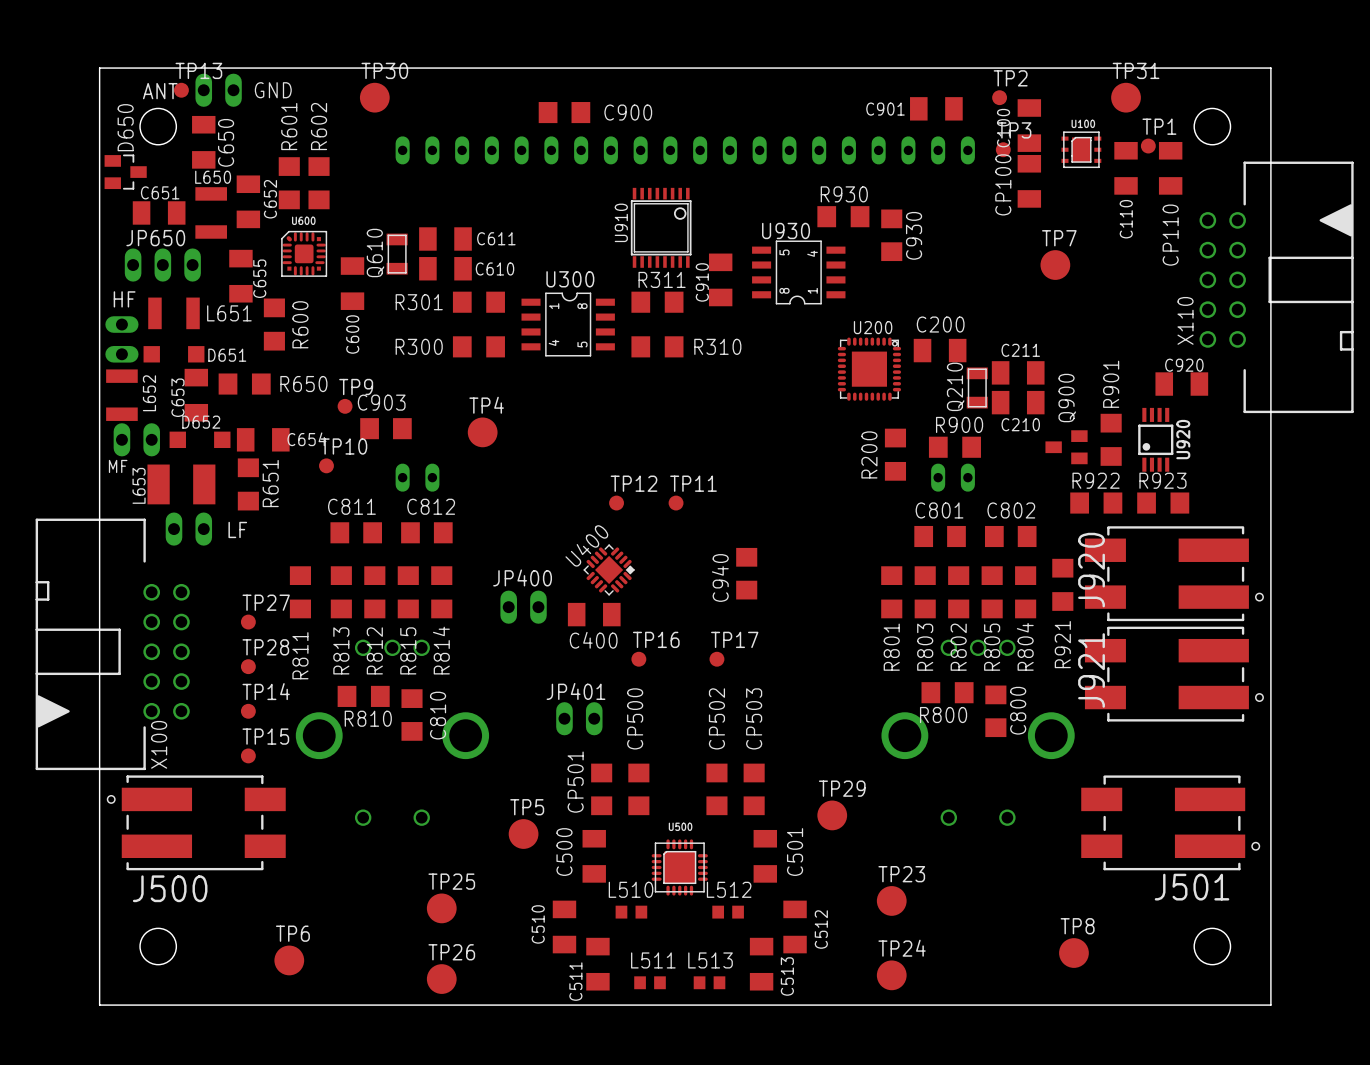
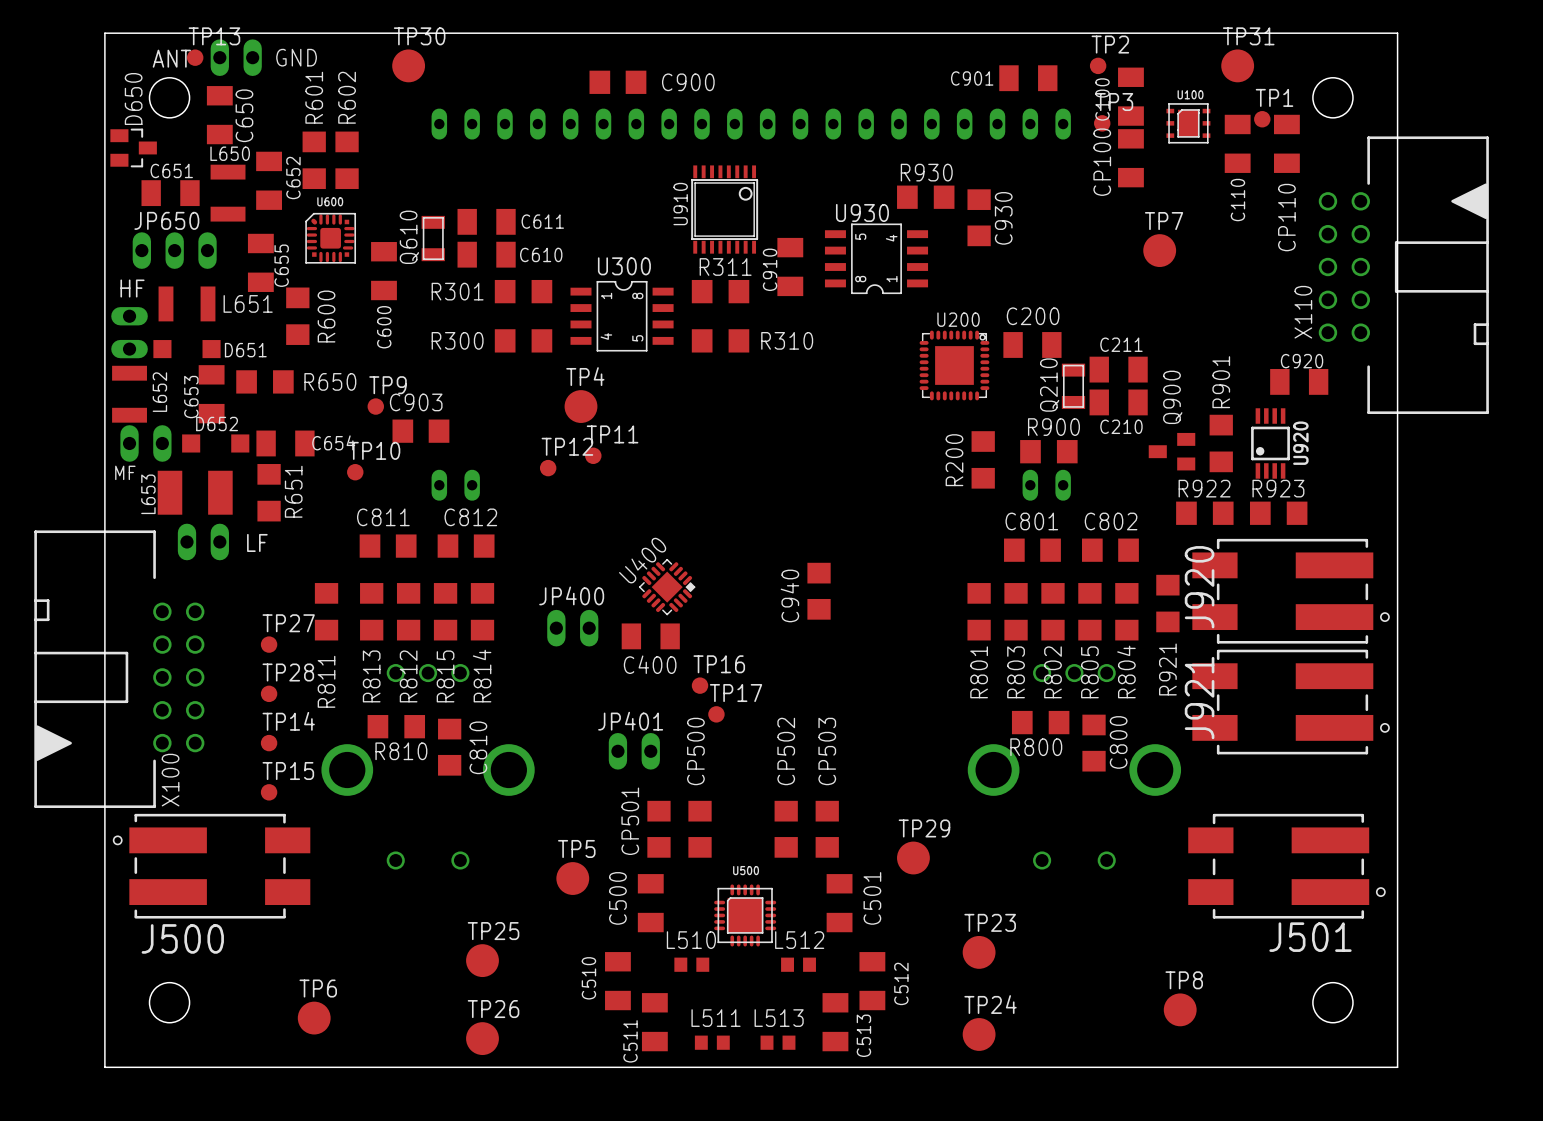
TP4 position: (482, 432) -> (580, 406)
TP12 position: (616, 503) -> (548, 468)
TP11 position: (676, 503) -> (593, 455)
TP17 position: (716, 659) -> (716, 714)

